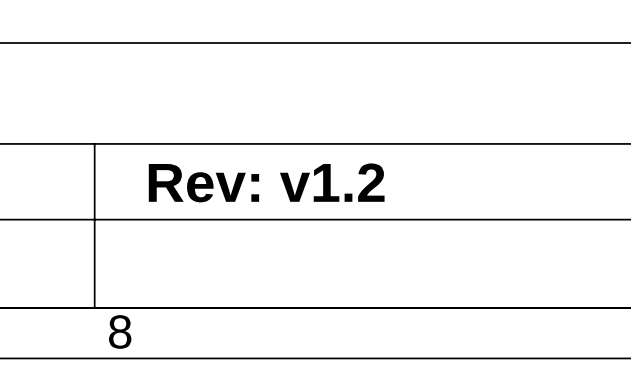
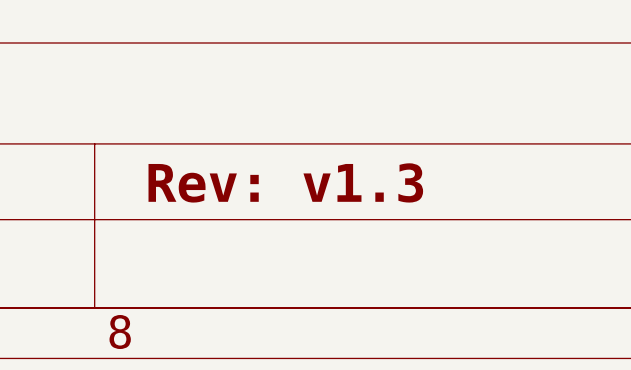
title block: Rev: v1.2 (266, 182) -> Rev: v1.3 (285, 182)

